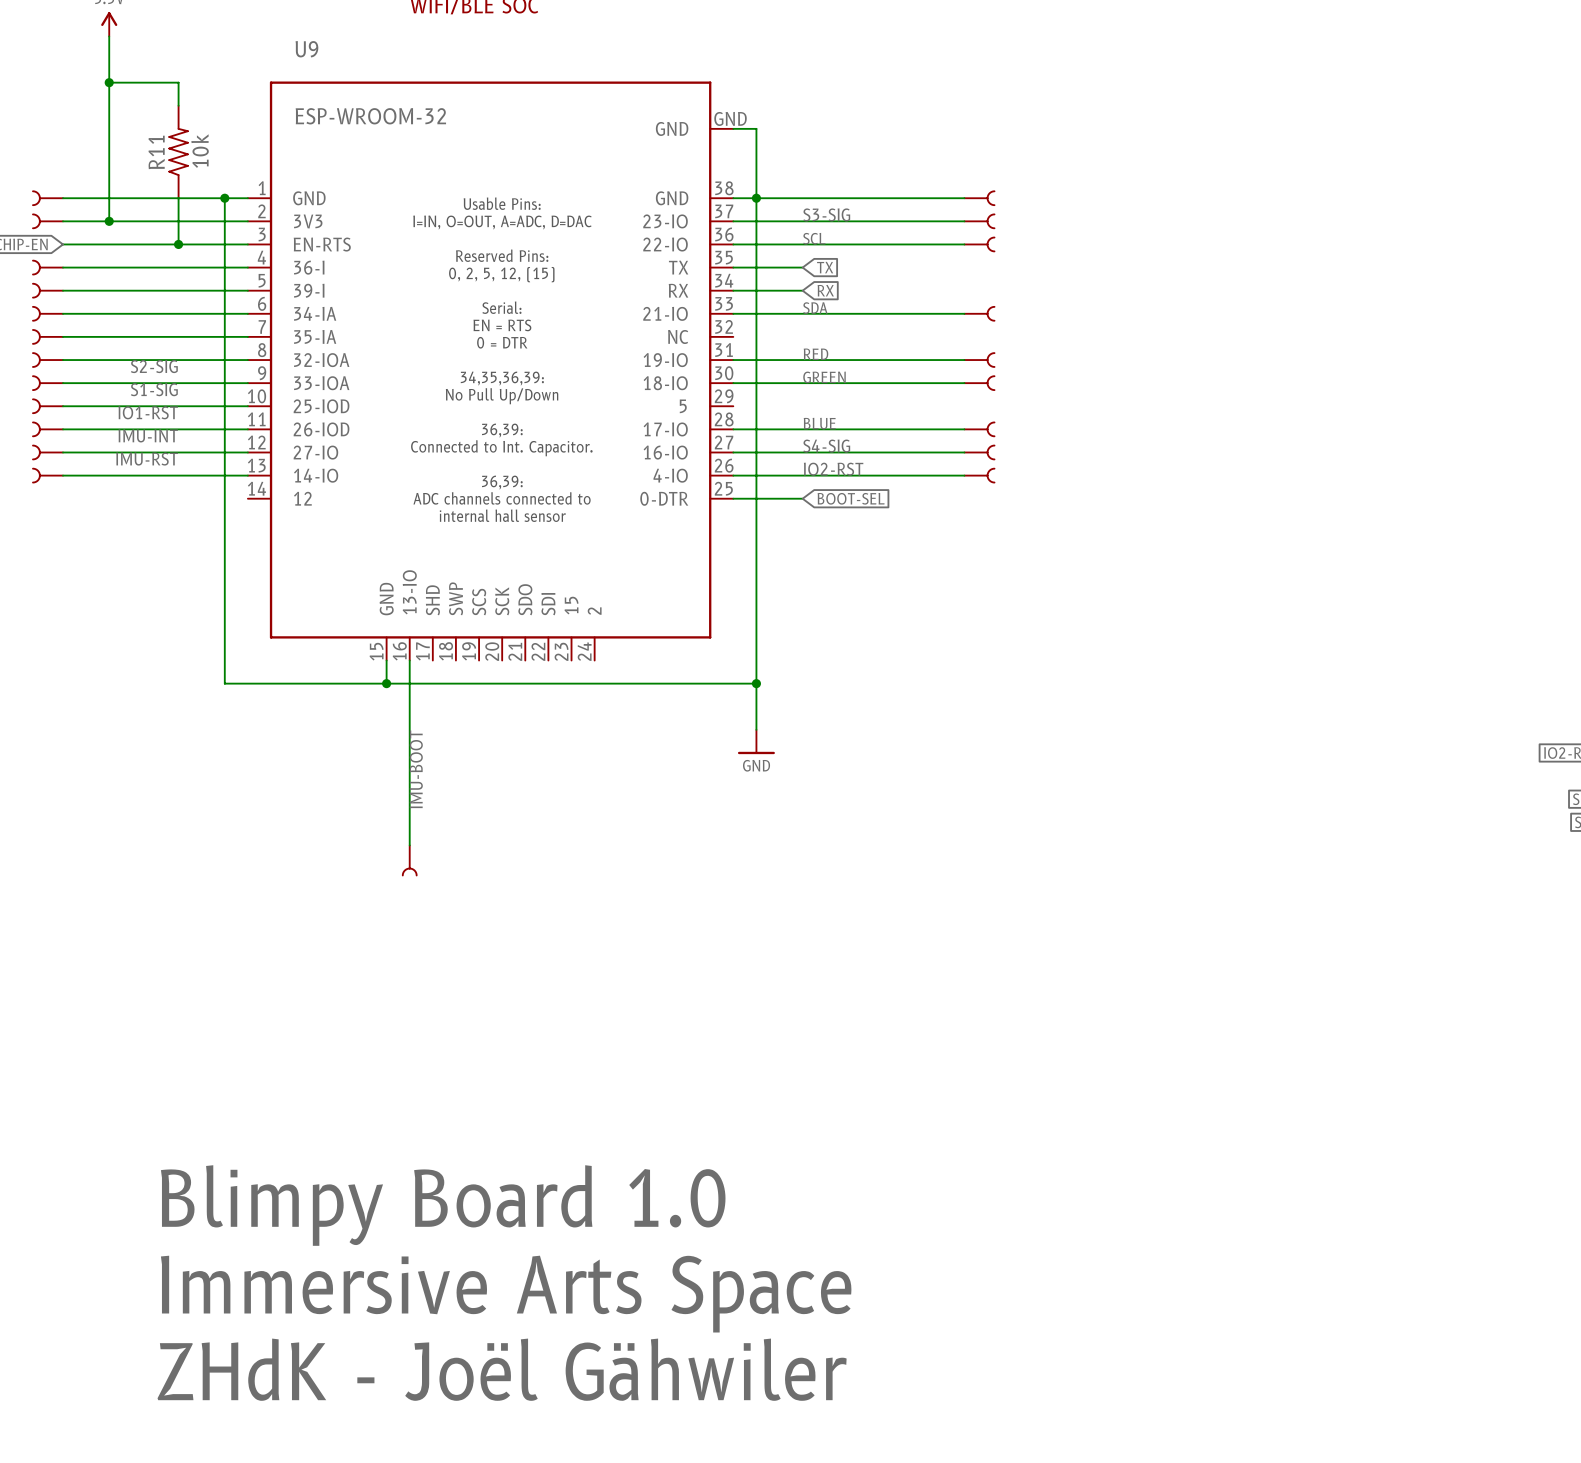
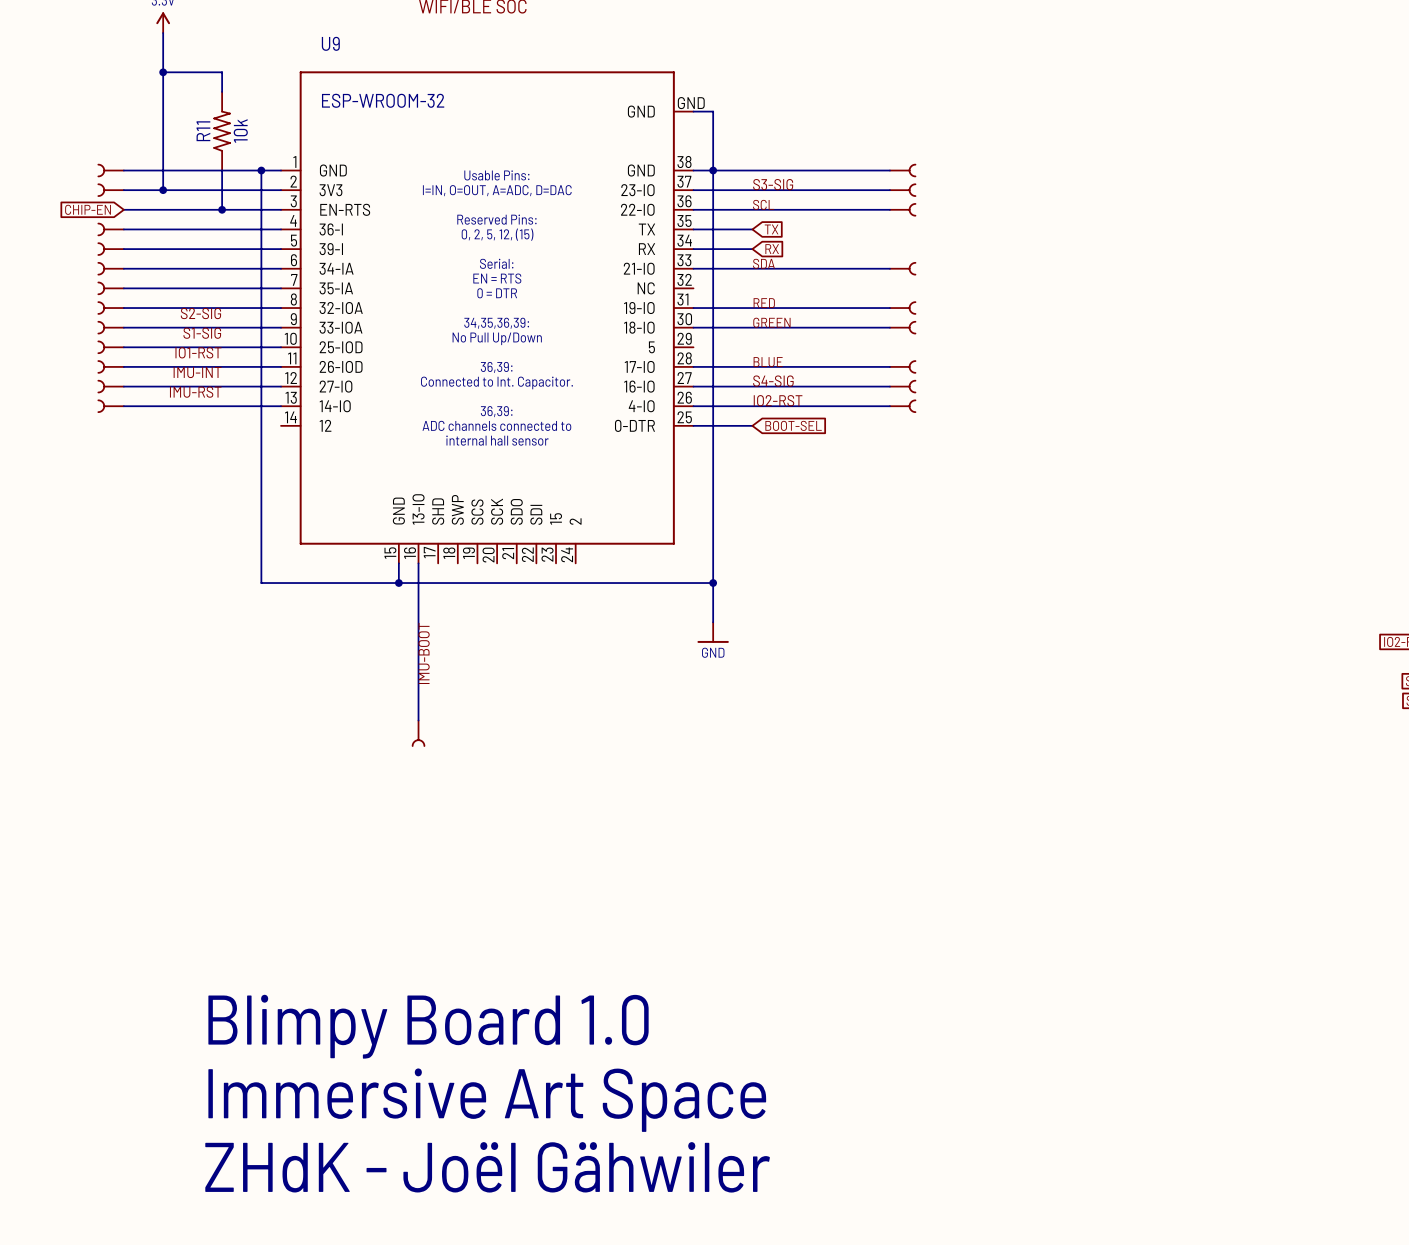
text: Immersive Arts Space (506, 1294) -> Immersive Art Space (487, 1100)

